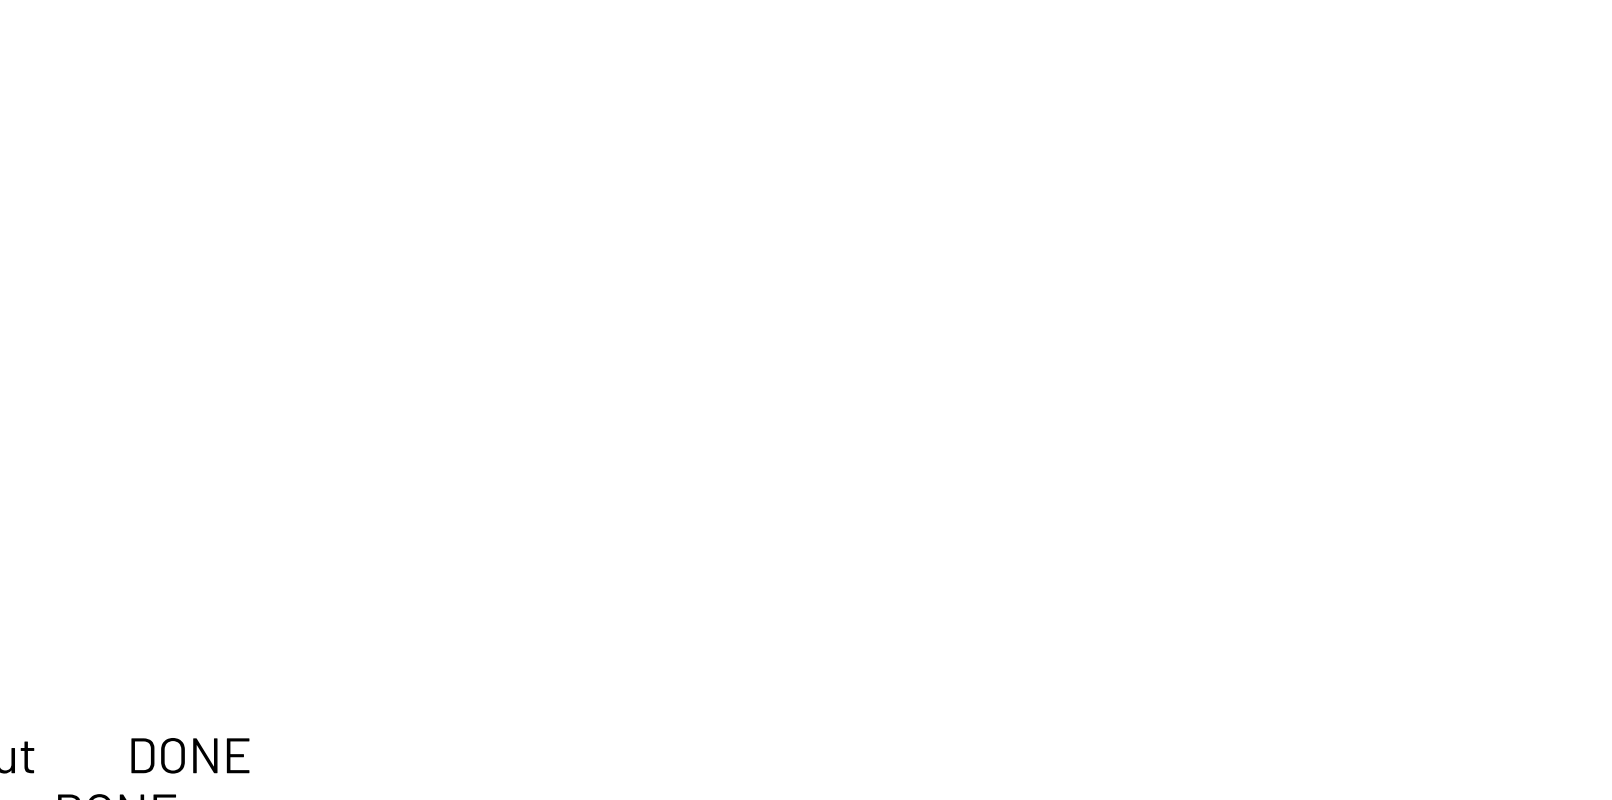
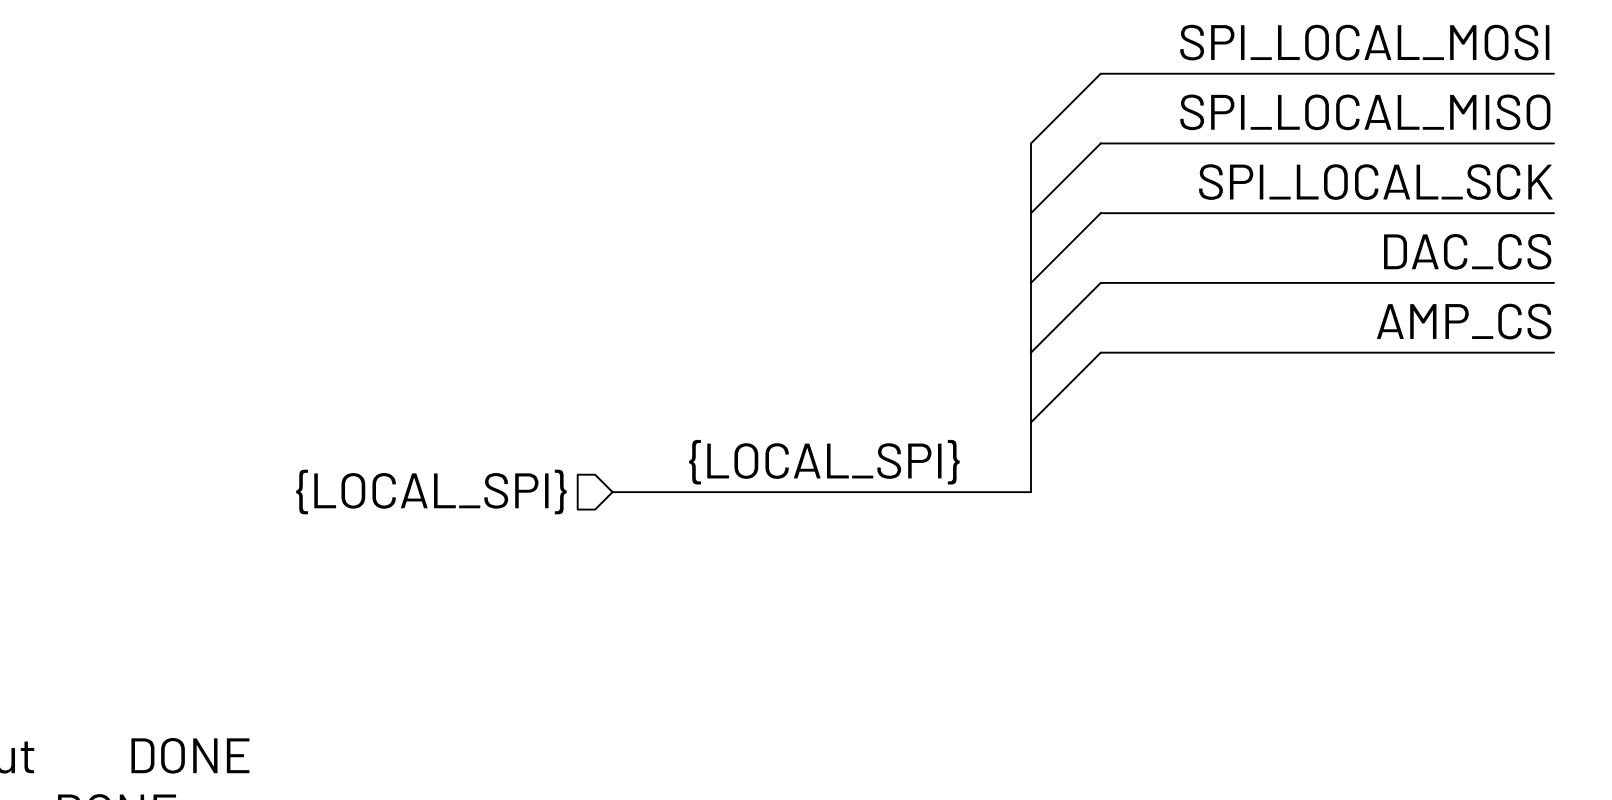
label: none -> SPI_LOCAL_MOSI (1364, 42)
wire: none -> (1554, 73) (1100, 73) (1030, 143)
label: none -> SPI_LOCAL_MISO (1365, 112)
bus: none -> (1030, 143) (1030, 492) (612, 492)
wire: none -> (1554, 143) (1100, 143) (1030, 213)
label: none -> SPI_LOCAL_SCK (1375, 182)
wire: none -> (1554, 213) (1100, 213) (1030, 282)
label: none -> DAC_CS (1467, 251)
wire: none -> (1554, 282) (1100, 282) (1030, 352)
label: none -> AMP_CS (1464, 321)
wire: none -> (1554, 352) (1100, 352) (1030, 422)
label: none -> {LOCAL_SPI} (824, 462)
hierarchical label: none -> {LOCAL_SPI} (431, 492)

